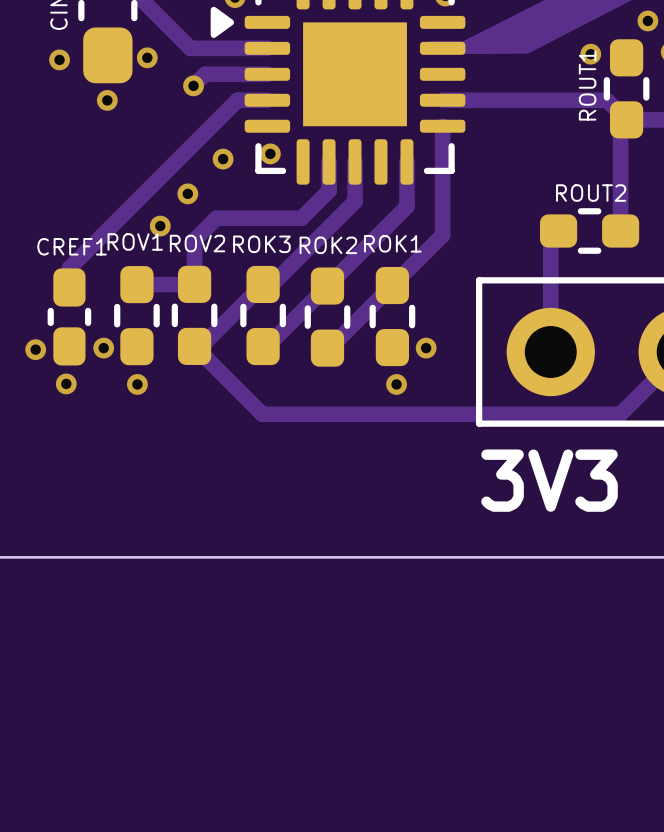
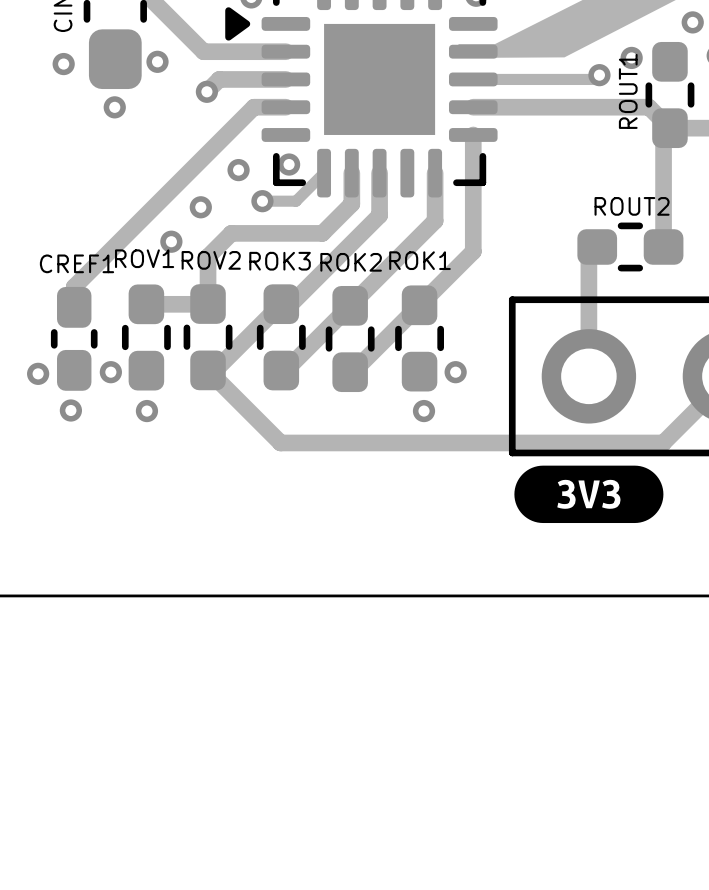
track: none -> (599, 75) (595, 79) (473, 79)
via: none -> (599, 75)
track: none -> (324, 173) (296, 201) (262, 201)
via: none -> (262, 201)
drawing: none -> [514, 465, 664, 524]
text: 3V3 (549, 480) -> none

